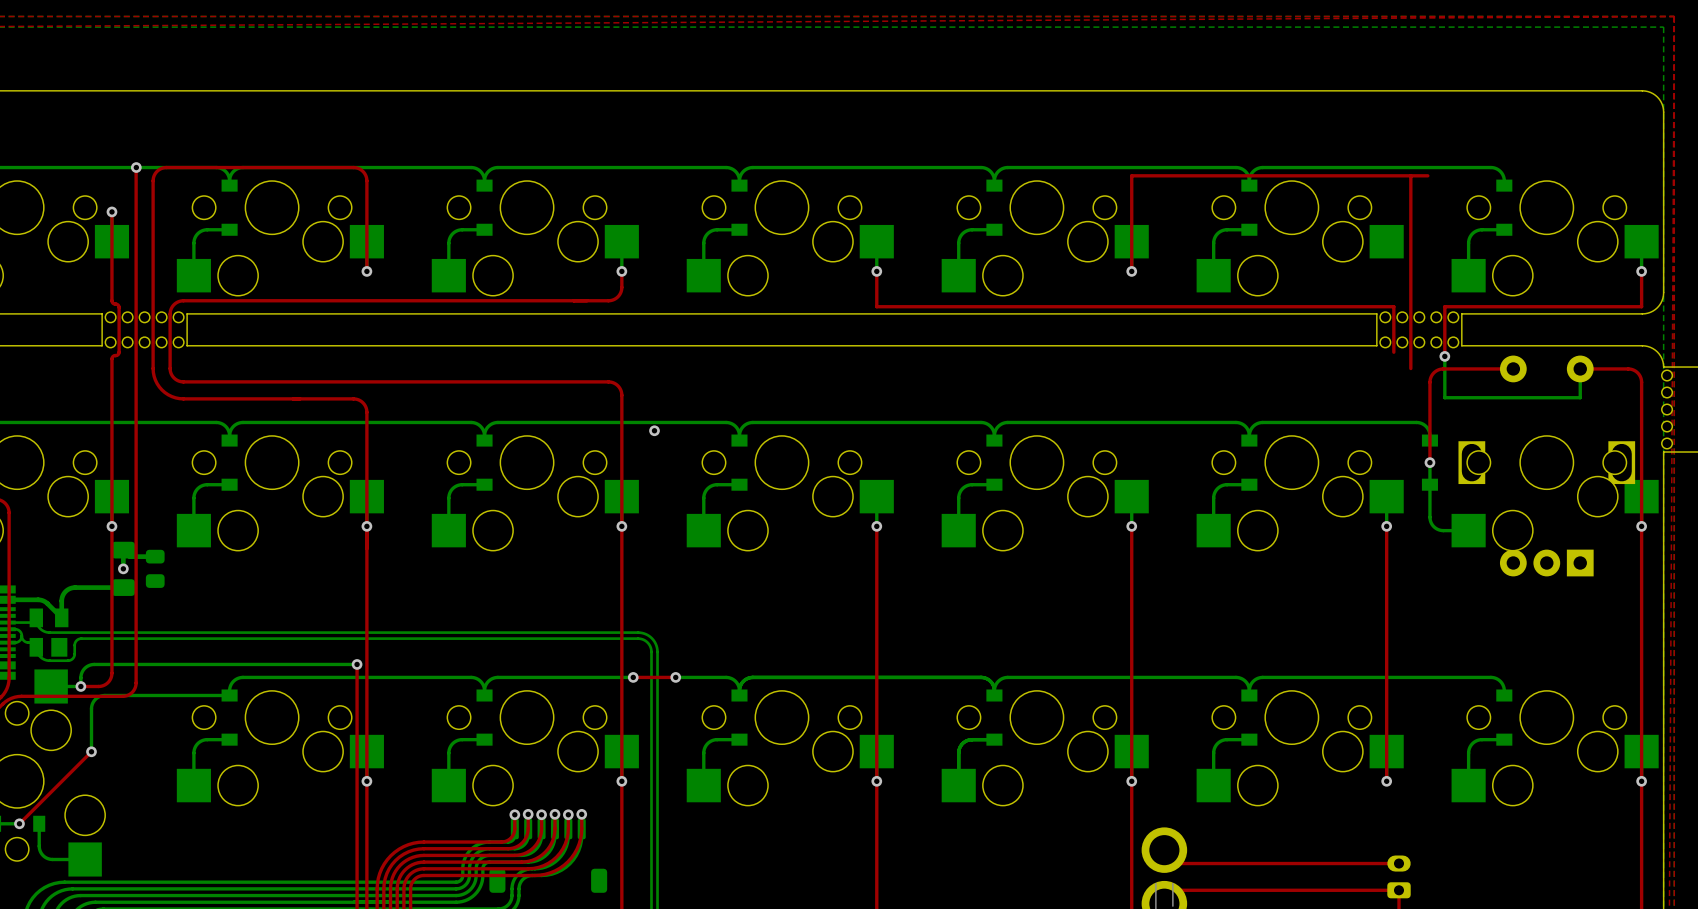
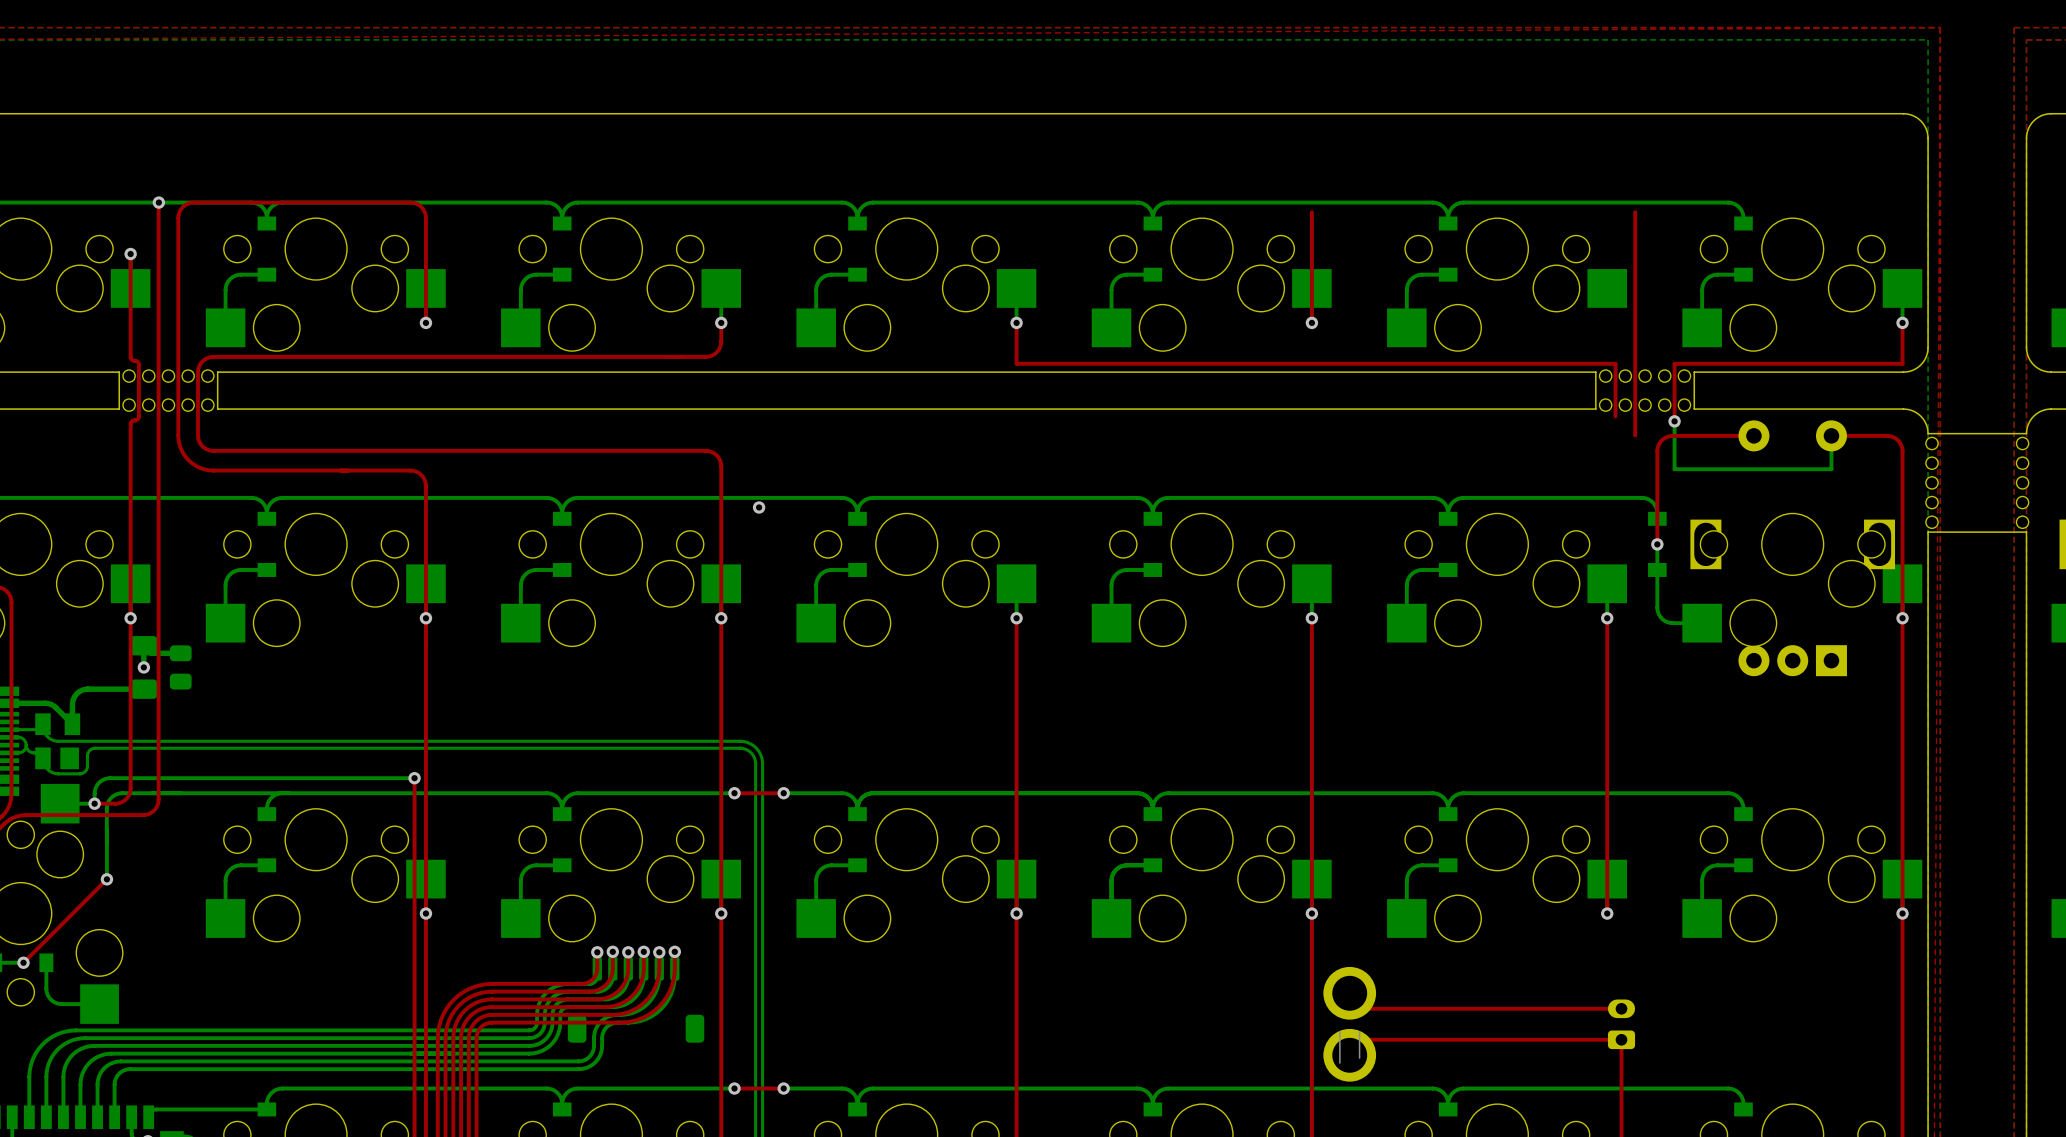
top track: (1131, 175) (1427, 175) -> none
bottom track: none -> (282, 793) (118, 793) (111, 797) (107, 805) (106, 842)
bottom track: (229, 695) (103, 695) (94, 700) (91, 708) -> none

